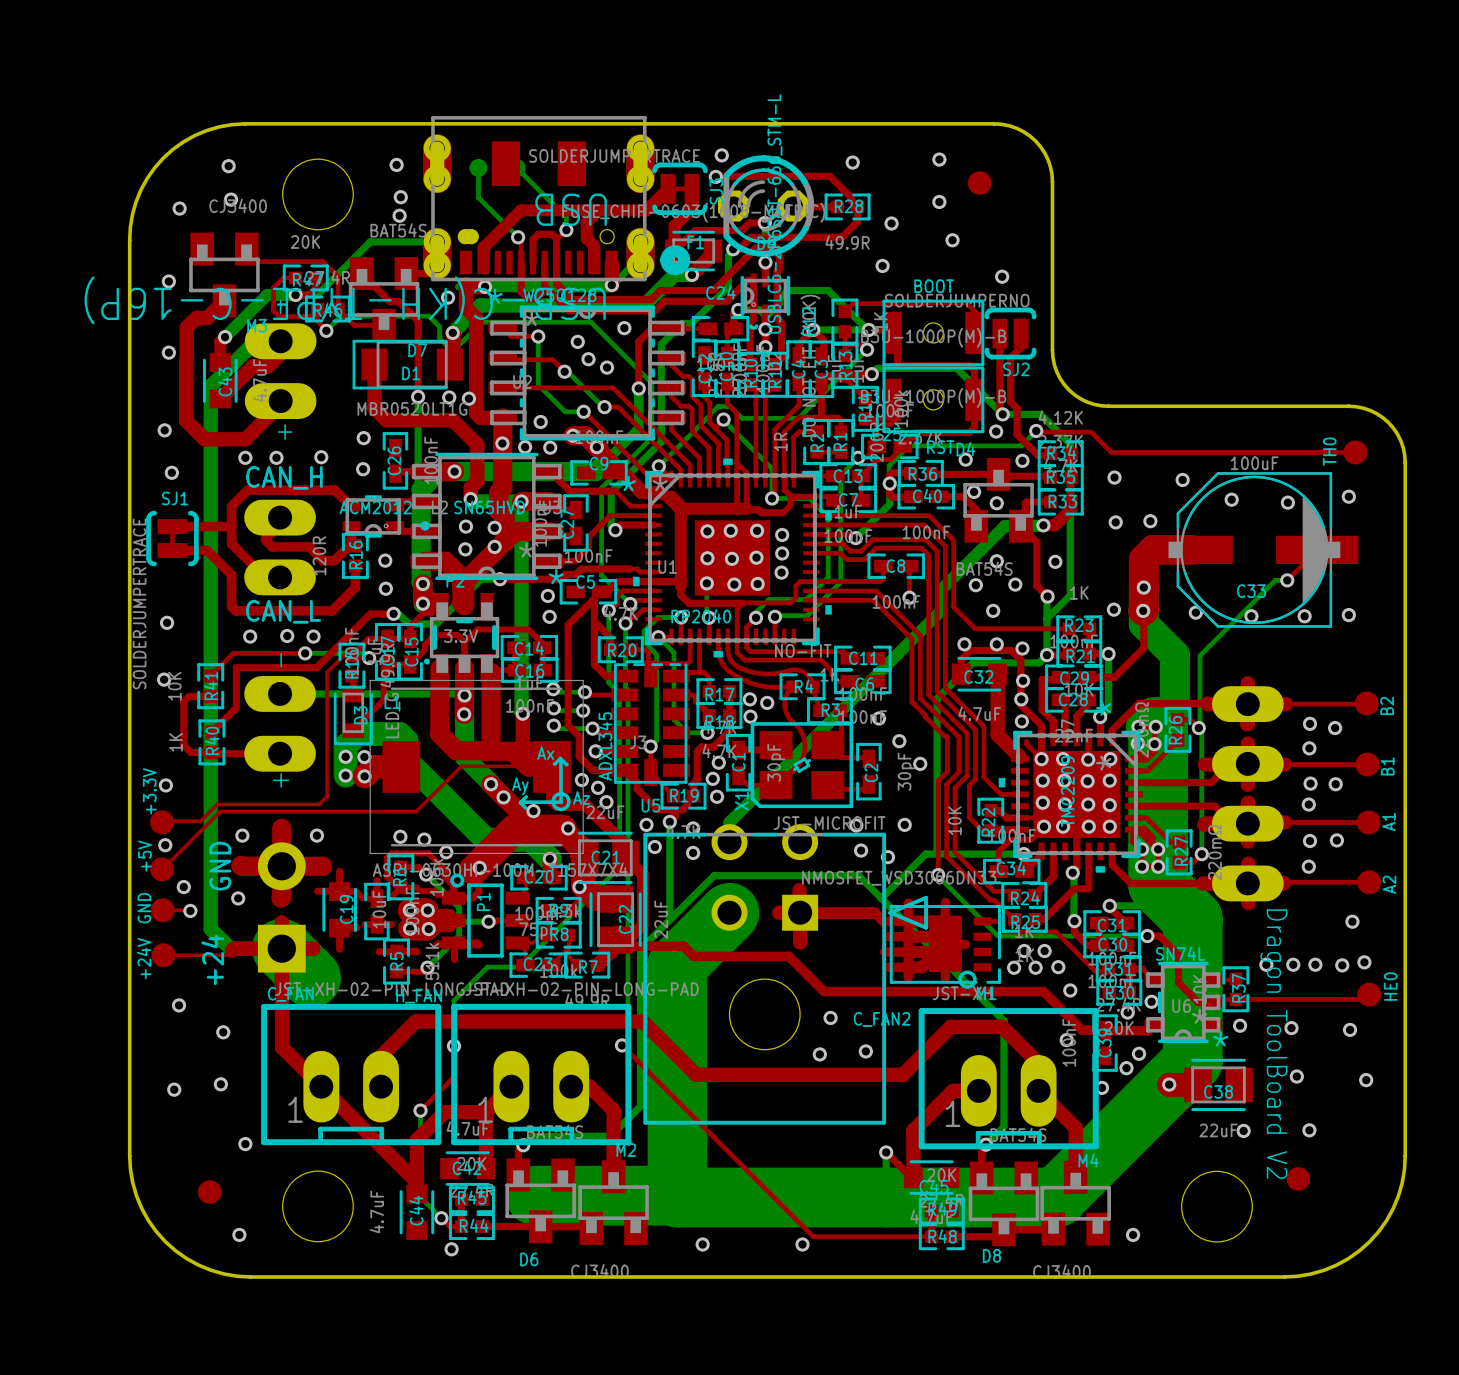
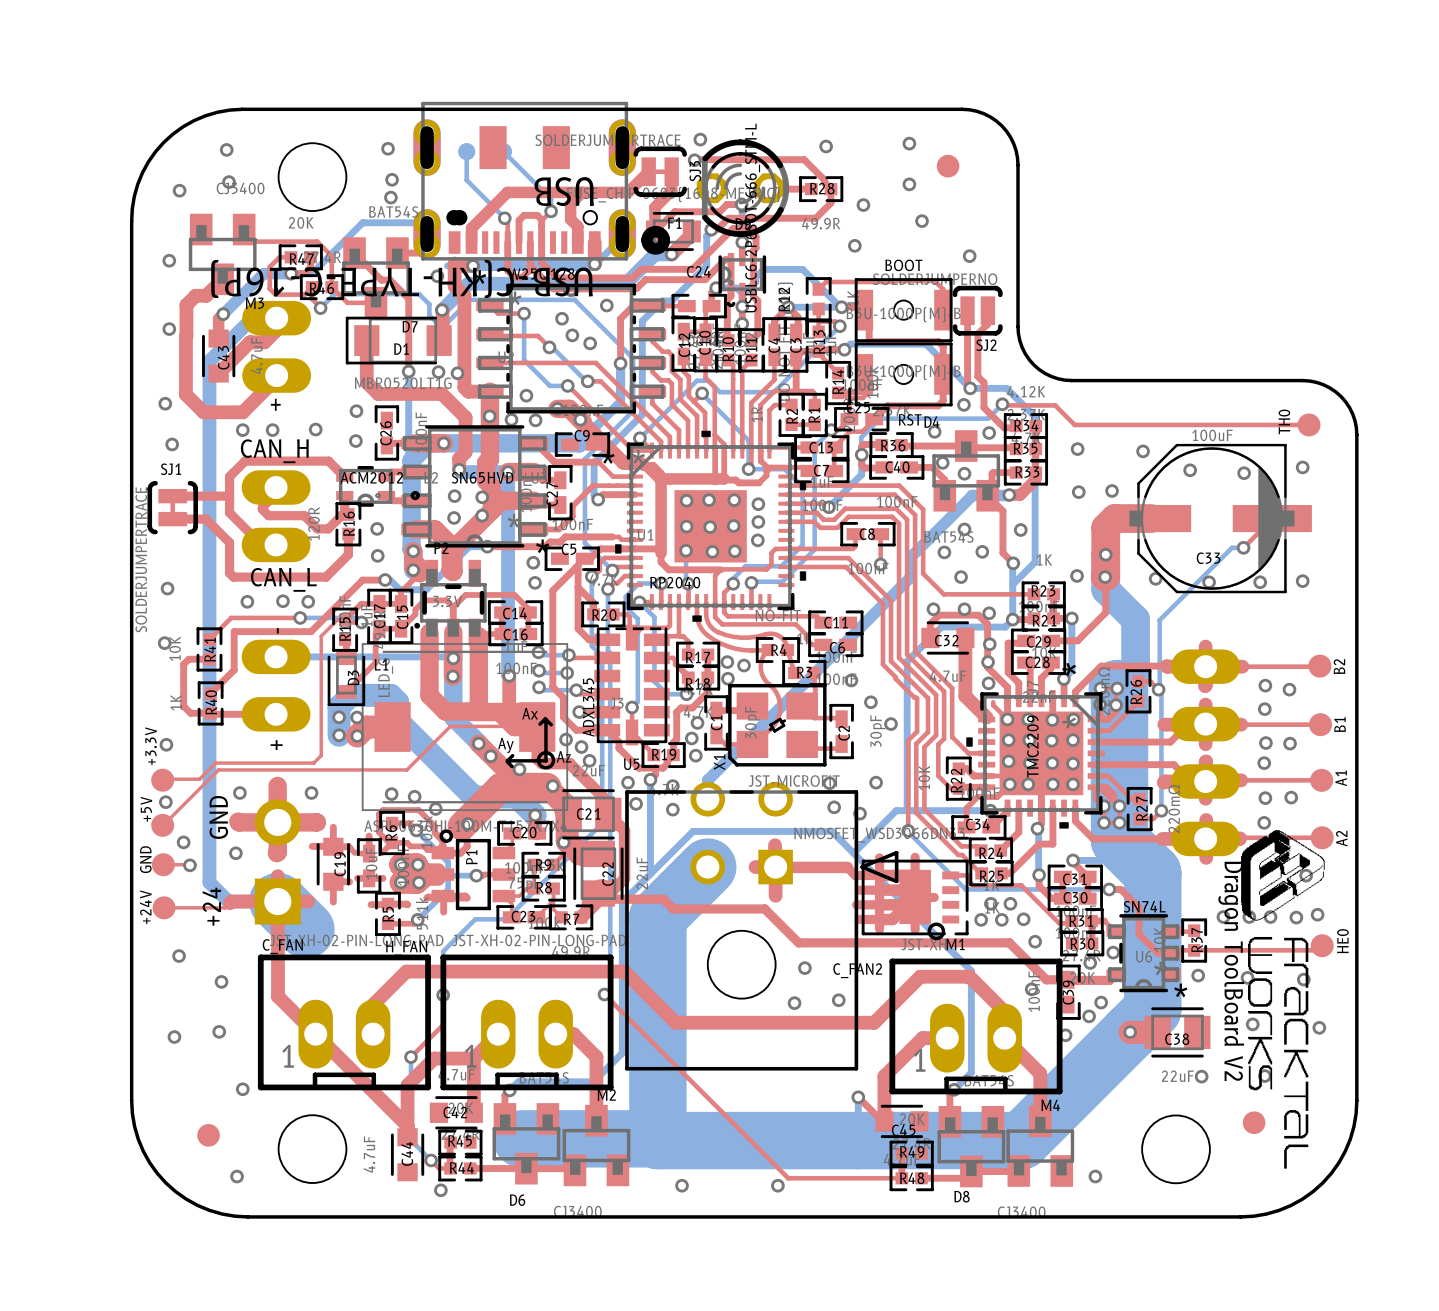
drawing: none -> [1241, 830, 1325, 1169]

